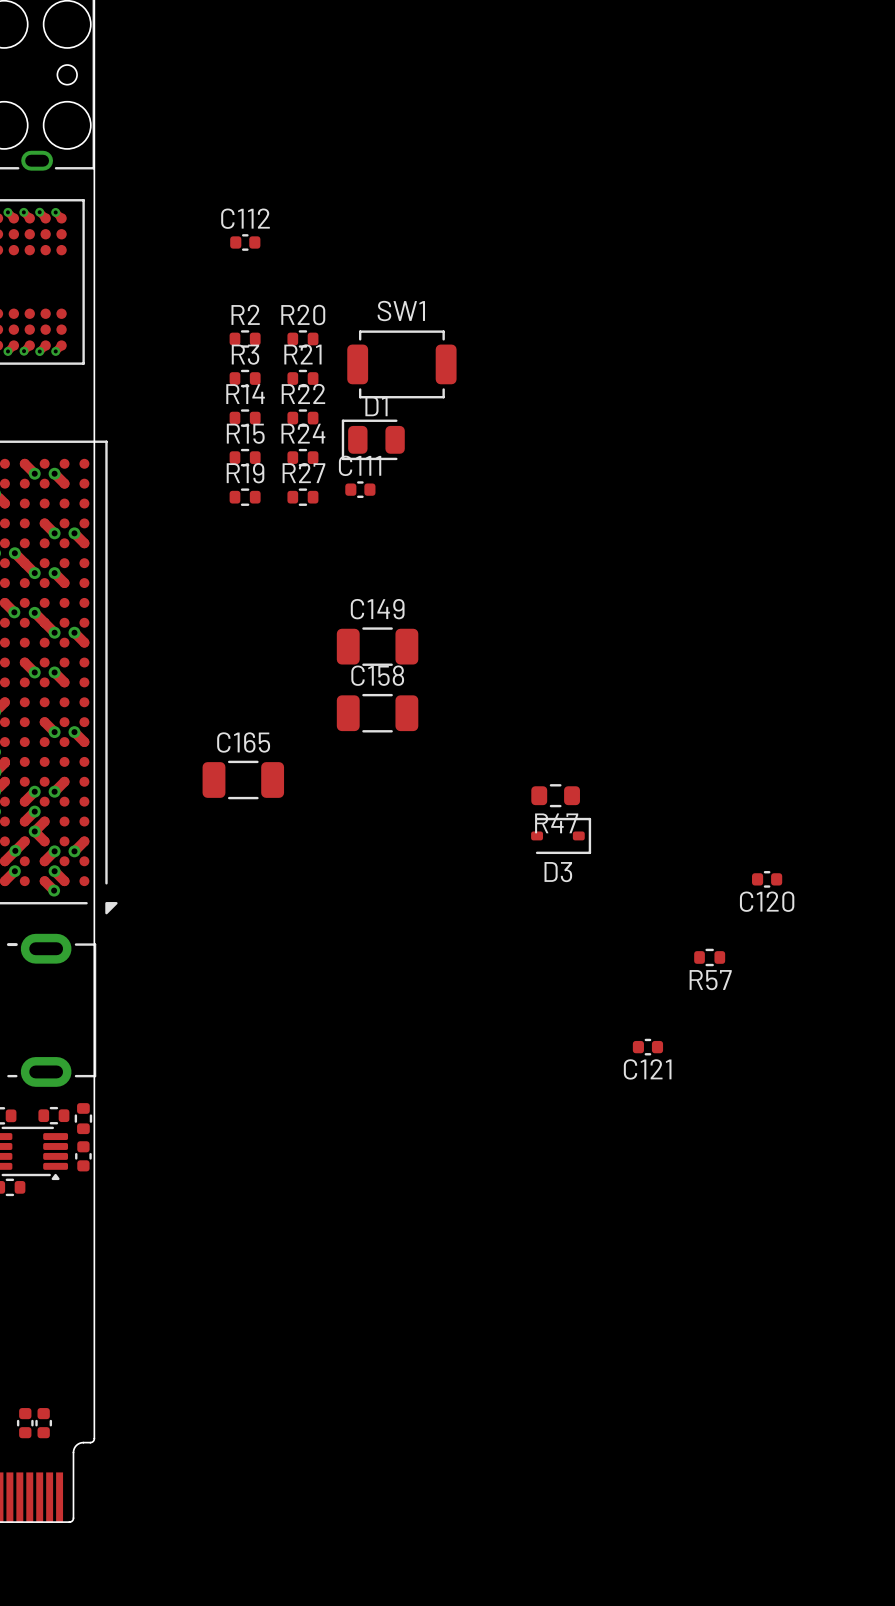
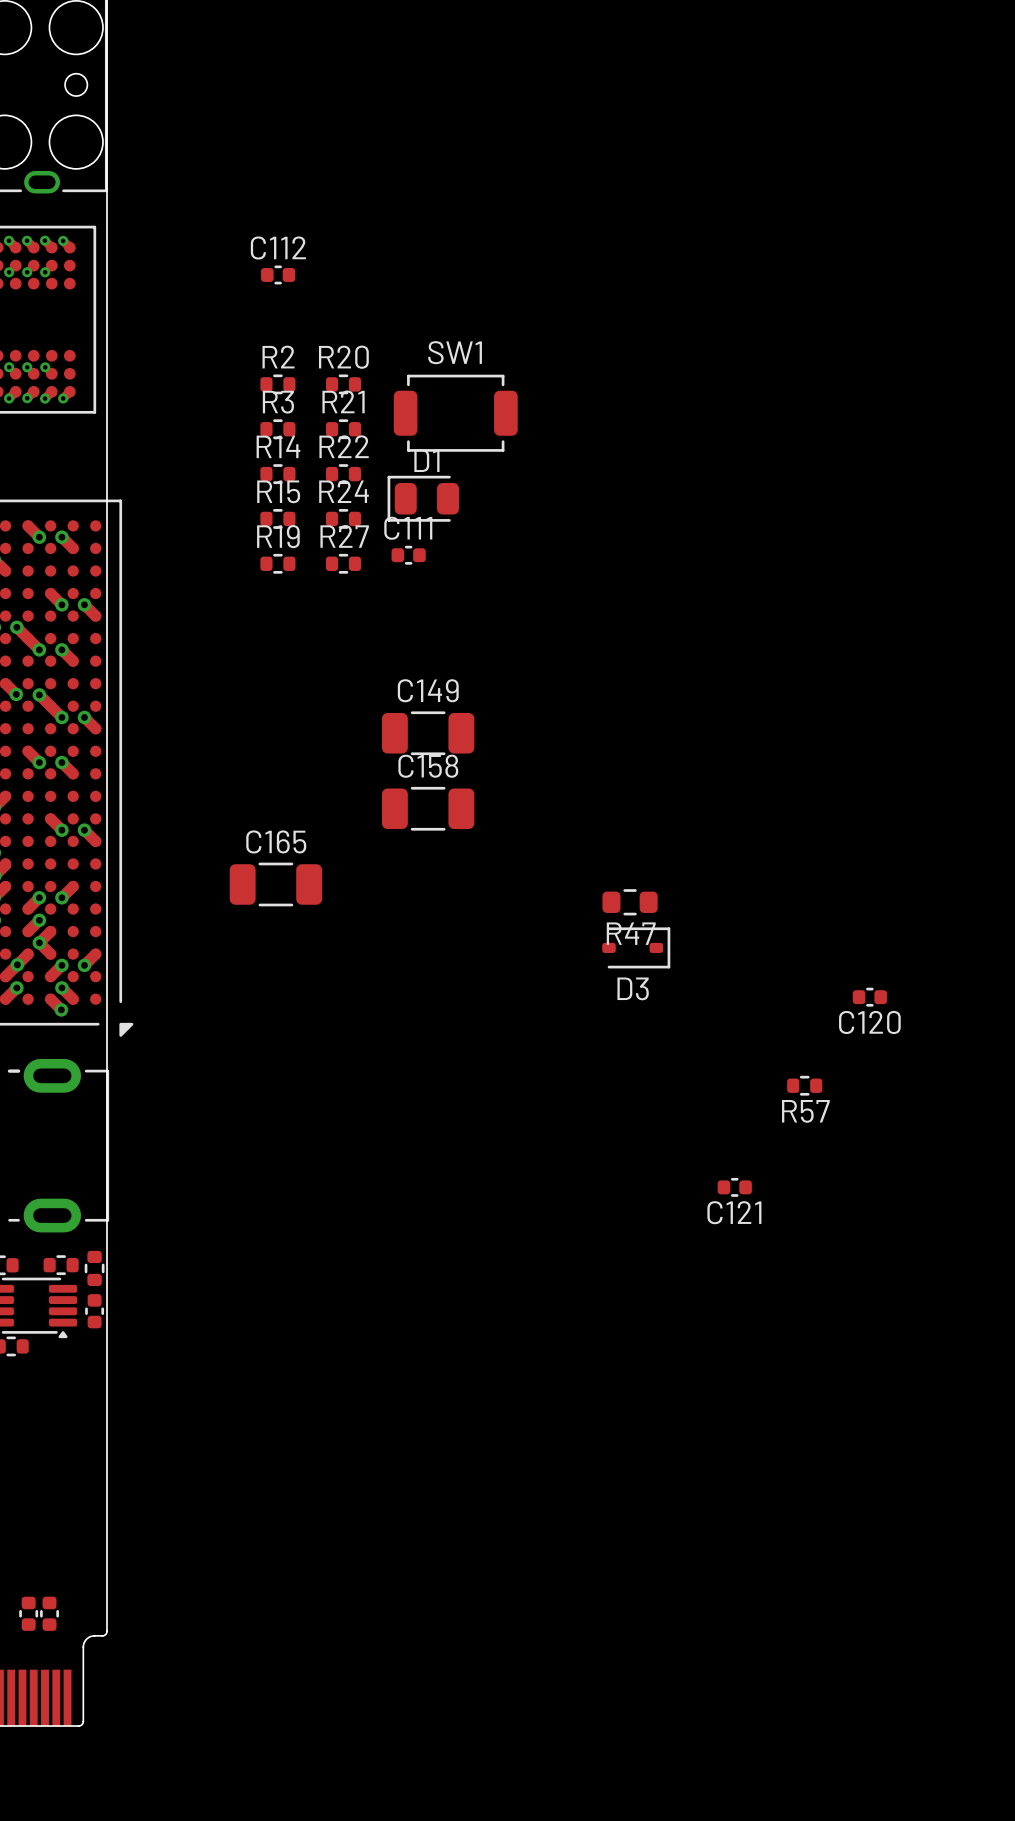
via: none -> (9, 272)
via: none -> (27, 272)
via: none -> (45, 272)
via: none -> (9, 367)
via: none -> (27, 367)
via: none -> (45, 367)

